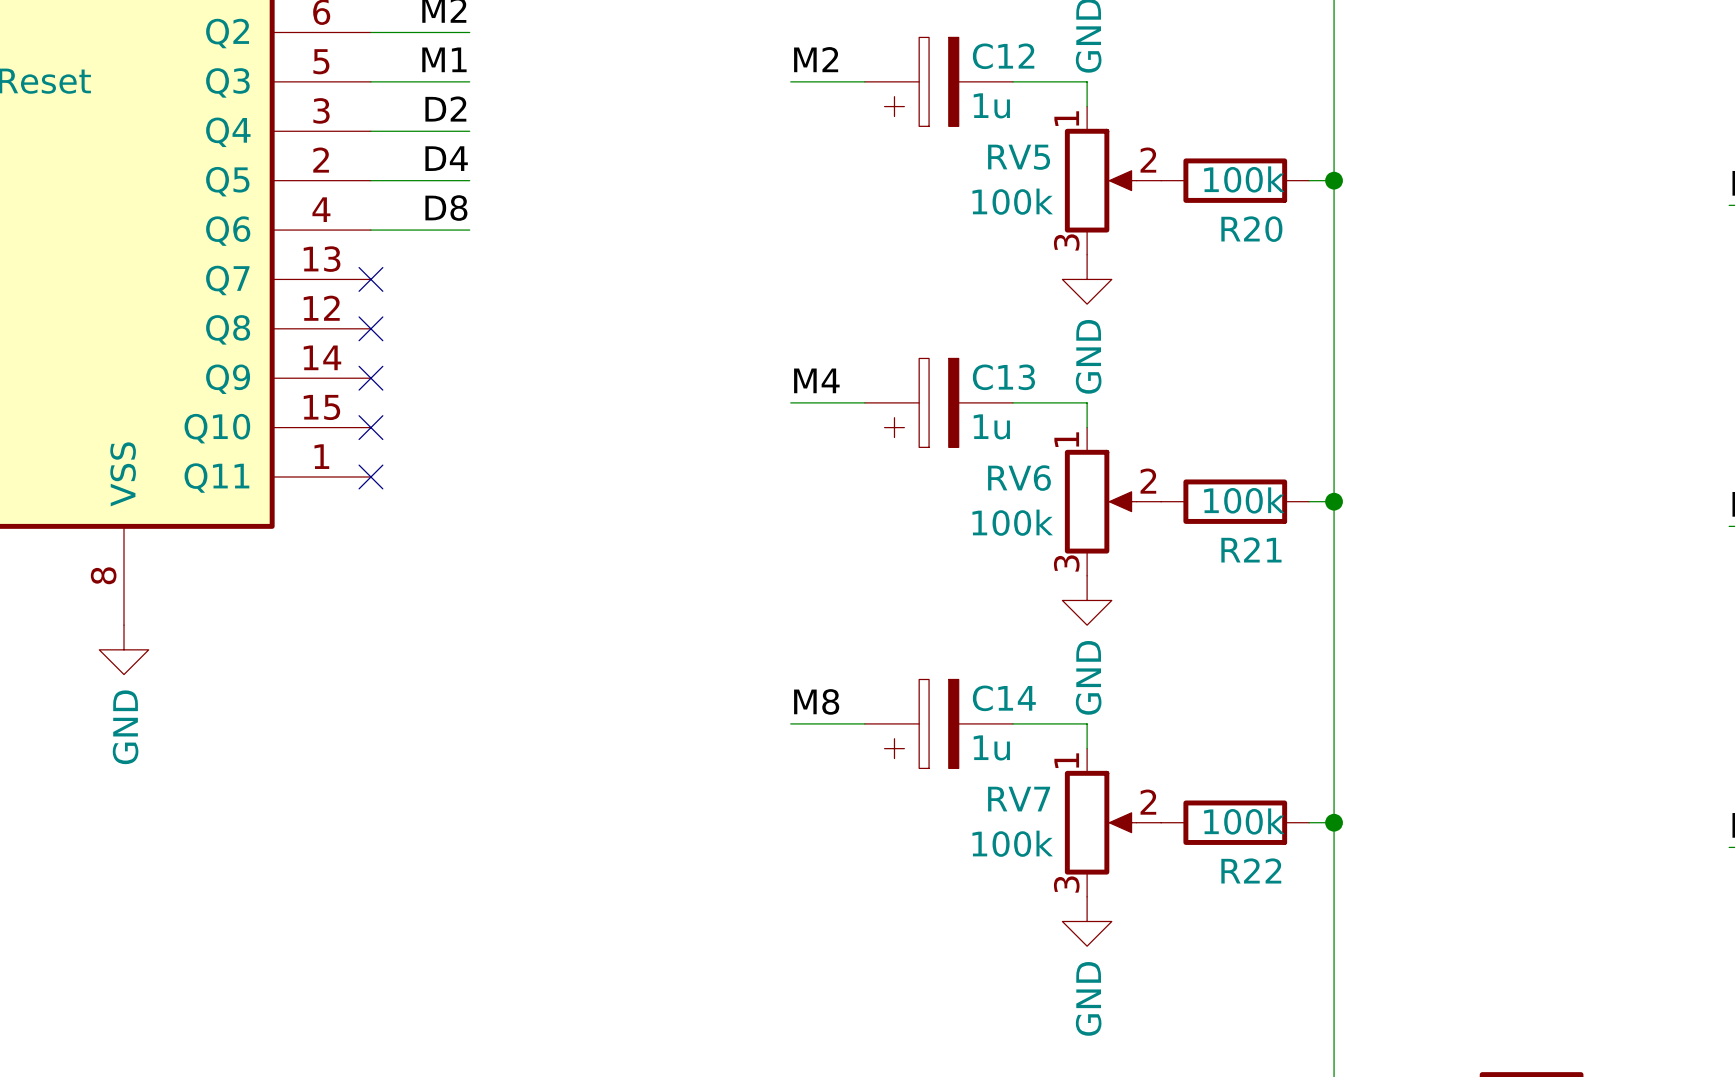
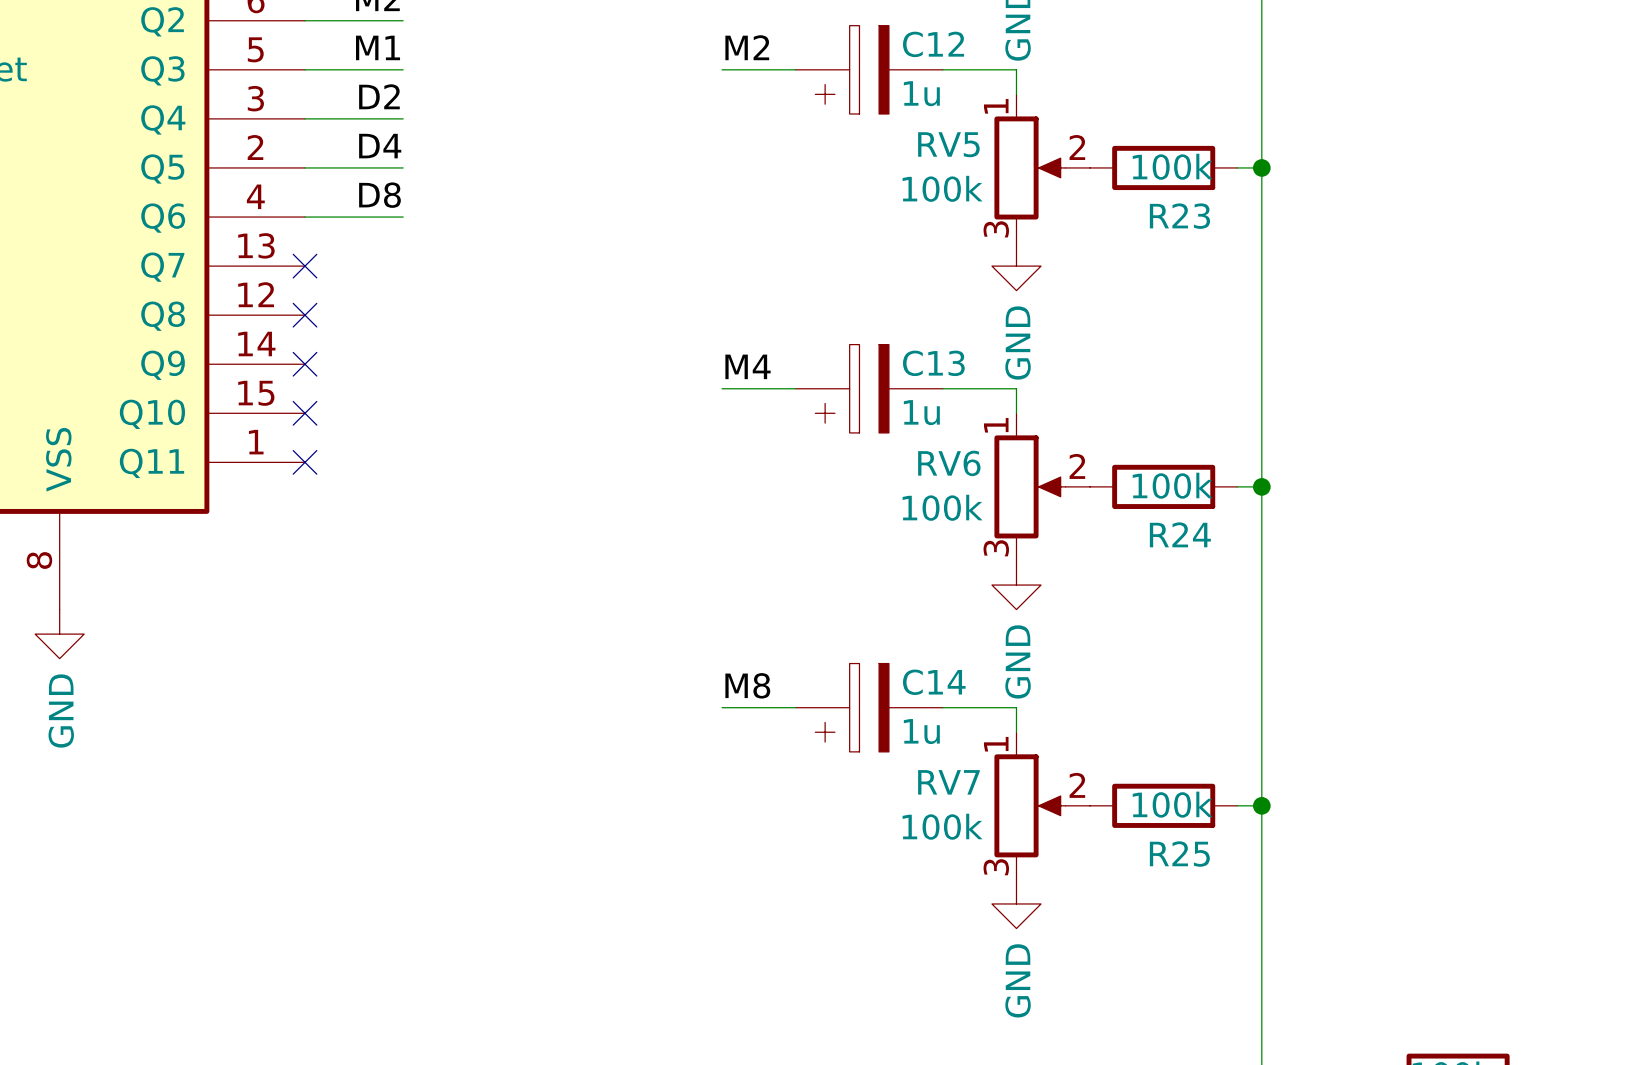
R20 name: R20 (1251, 229) -> R23 (1179, 216)
R21 name: R21 (1251, 549) -> R24 (1180, 534)
R22 name: R22 (1251, 870) -> R25 (1179, 854)

